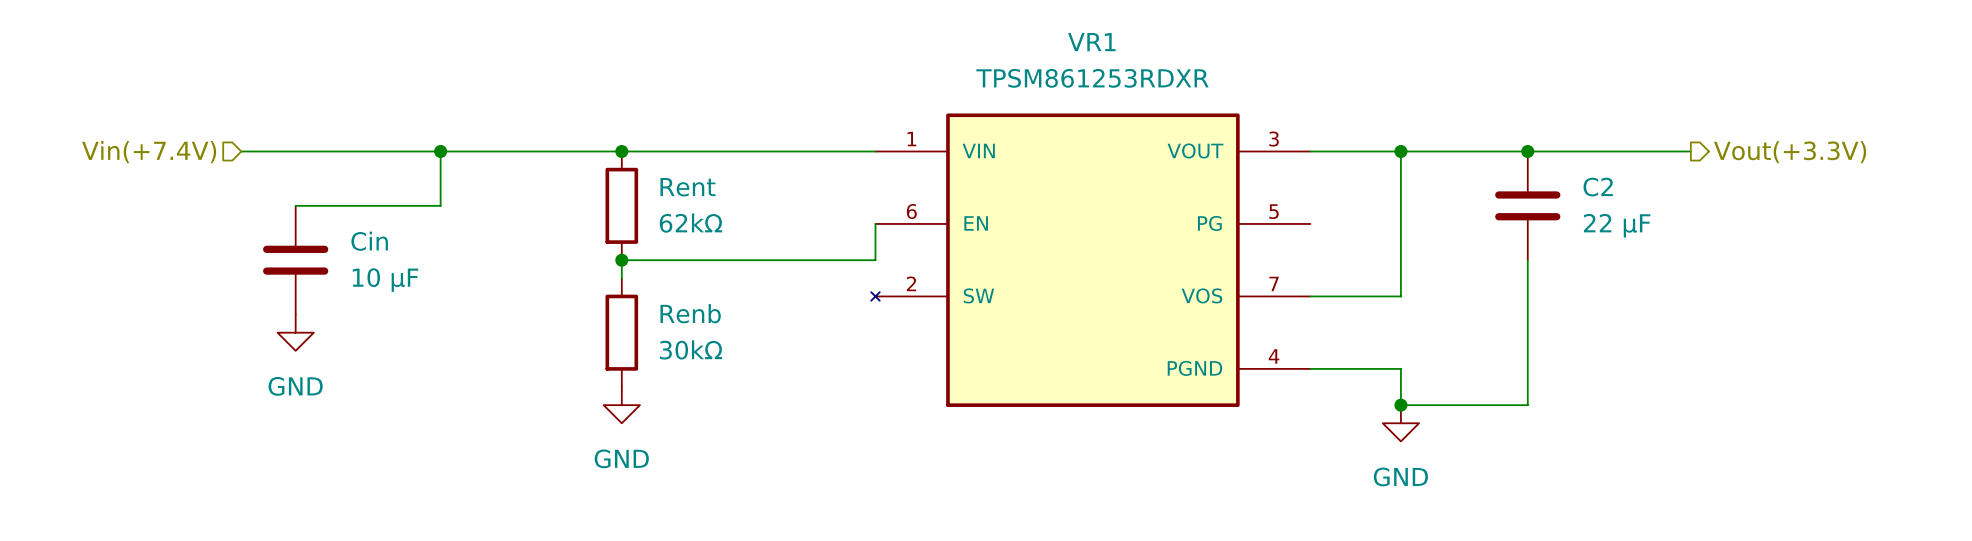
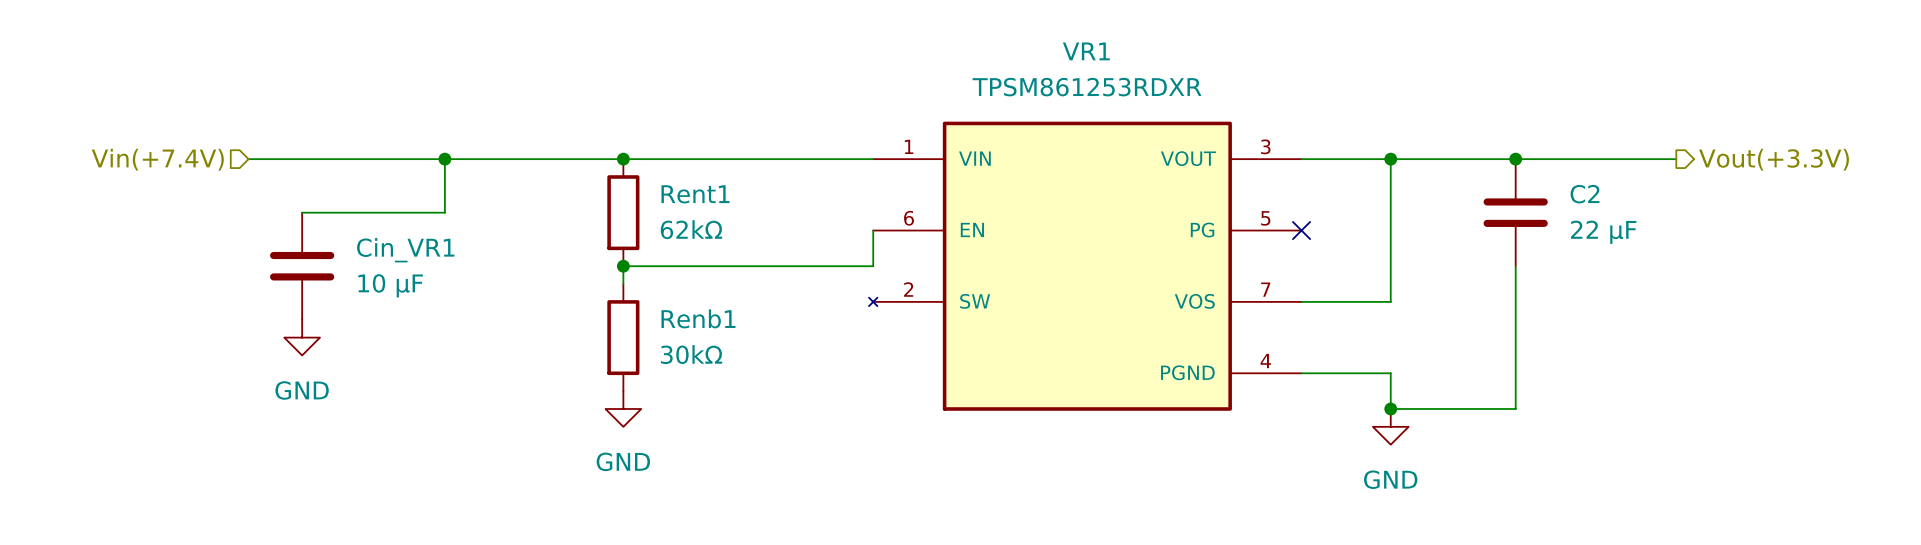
Rent name: Rent (688, 187) -> Rent1 (695, 194)
no-connect mark: none -> (1301, 230)
Cin name: Cin (369, 241) -> Cin_VR1 (405, 250)
Renb name: Renb (690, 313) -> Renb1 (698, 318)

